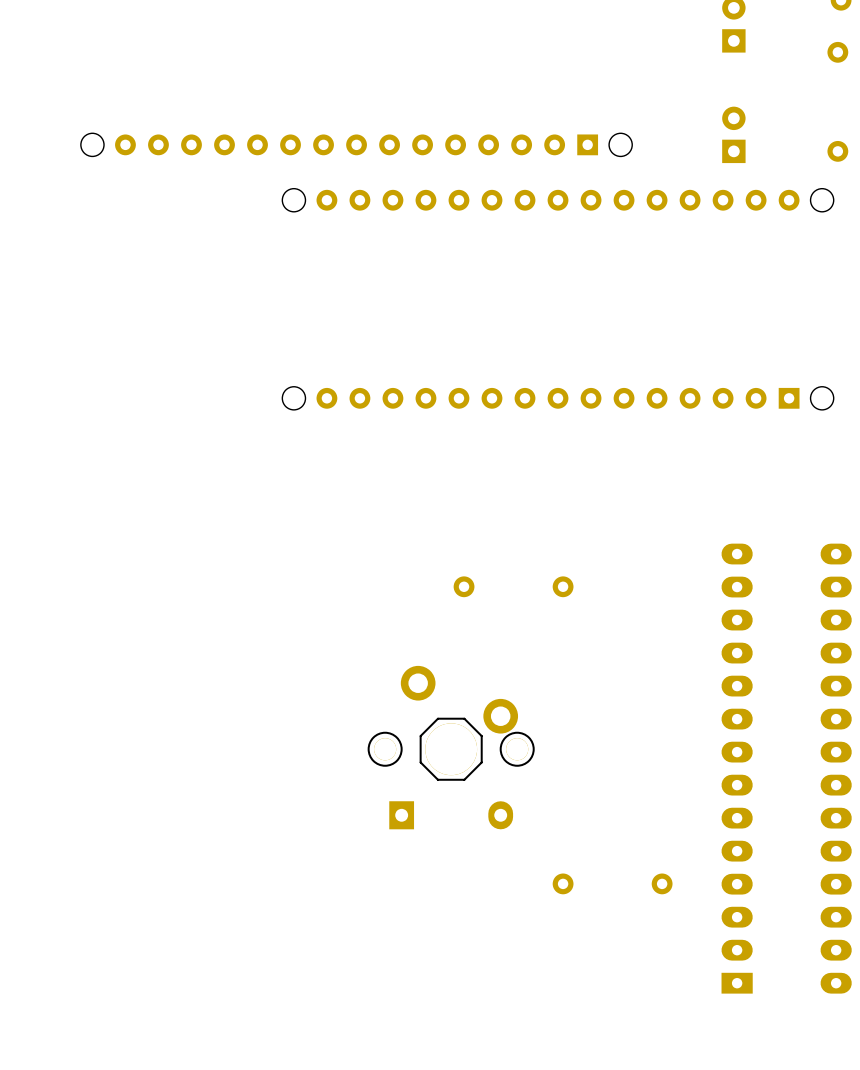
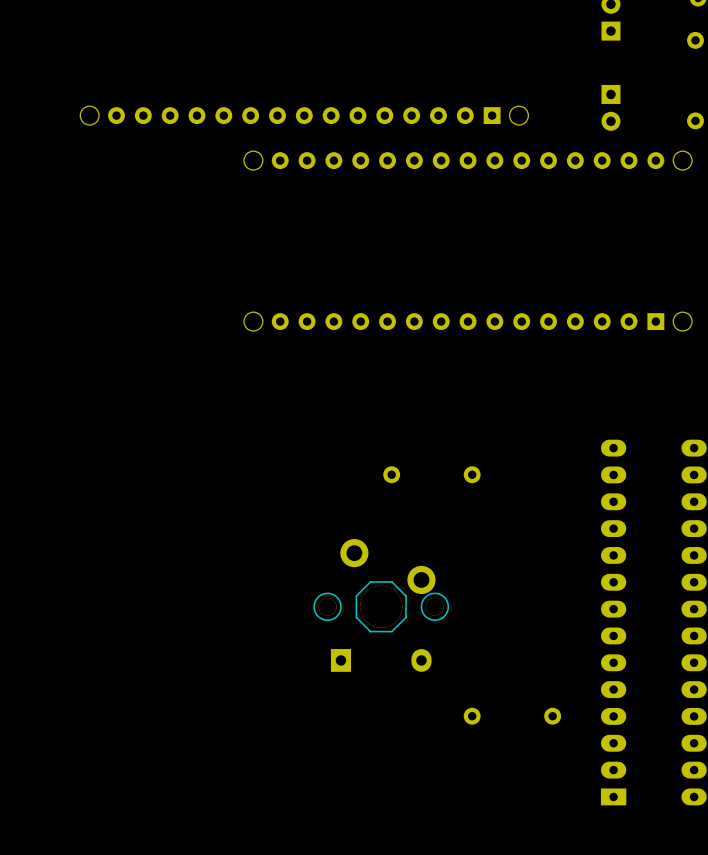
part rotation: 0° (733, 134) -> 180° (610, 107)

